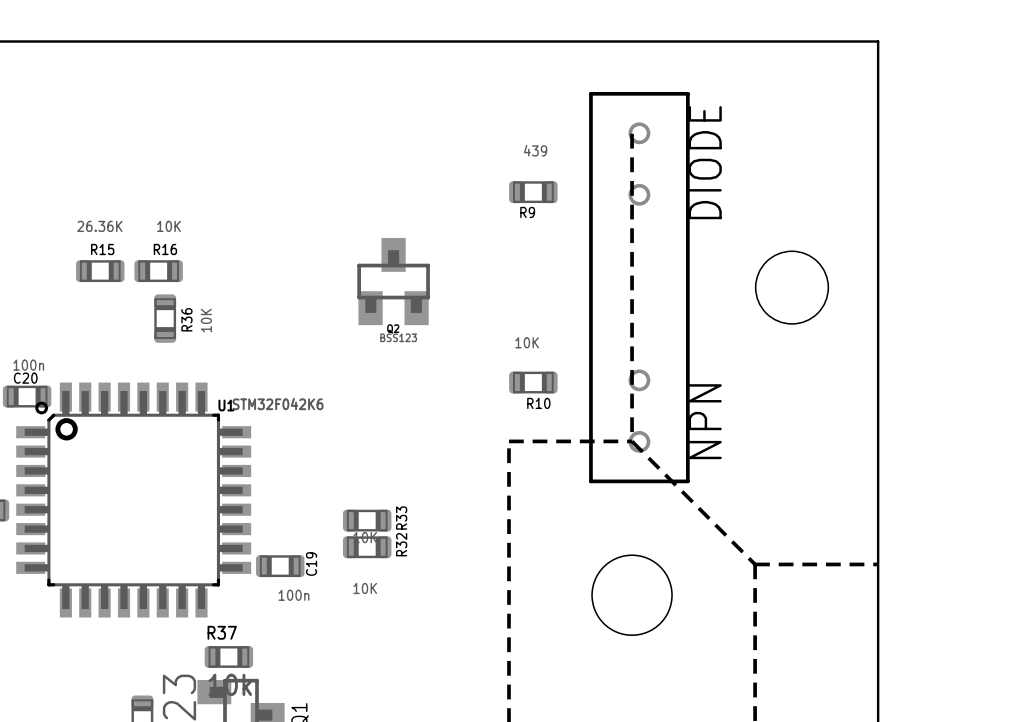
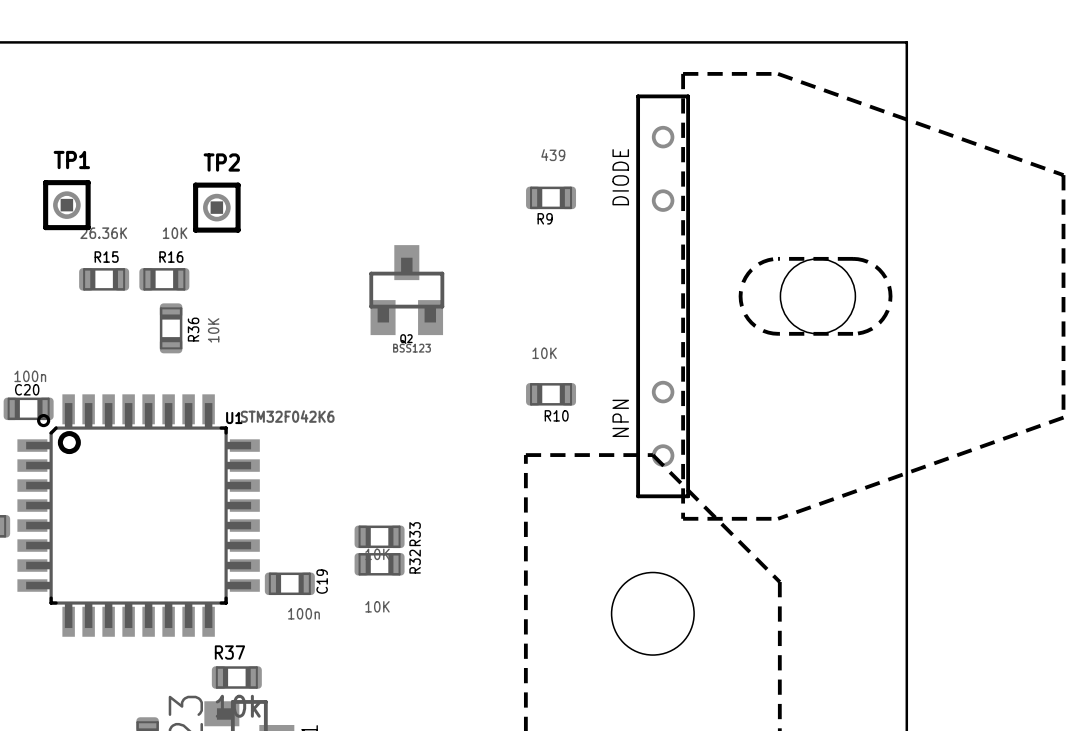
line: (632, 133) (632, 441) -> none
TP1: none -> (66, 205)
TP2: none -> (216, 207)
part: (639, 287) -> none
part: none -> (850, 296)
line: (755, 564) (878, 564) -> none

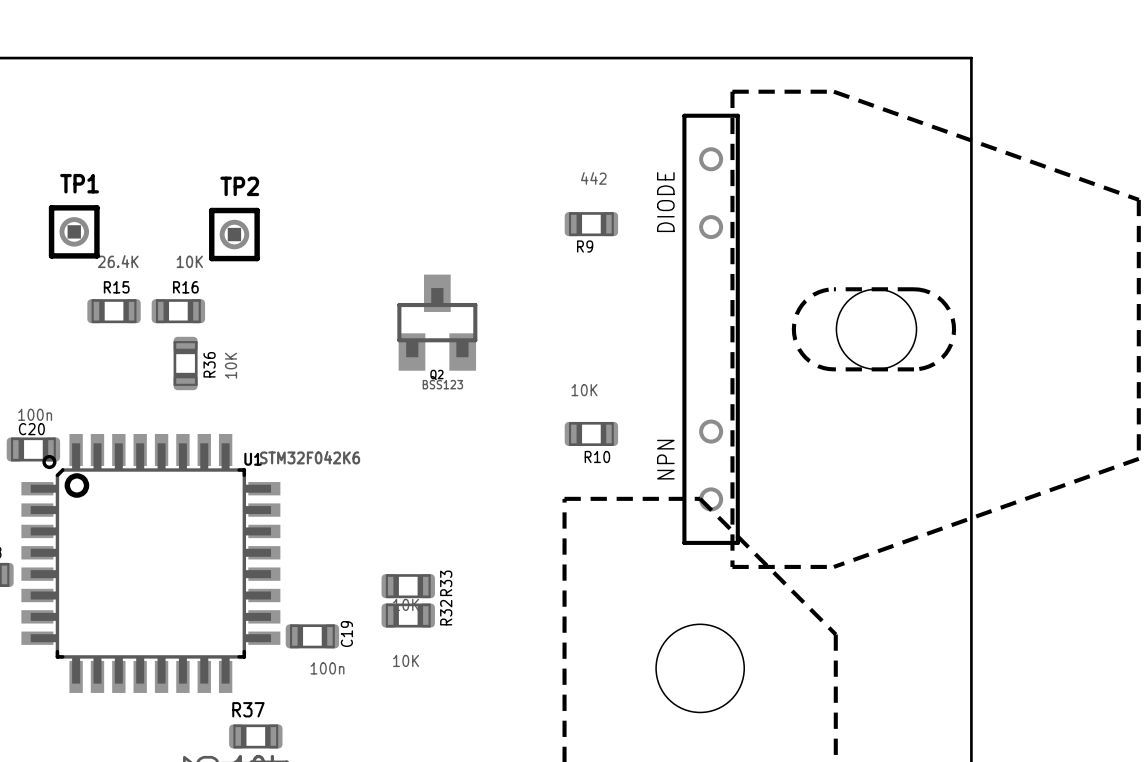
R9 value: 439 (553, 155) -> 442 (593, 178)
R15 value: 26.36K (103, 233) -> 26.4K (118, 261)

